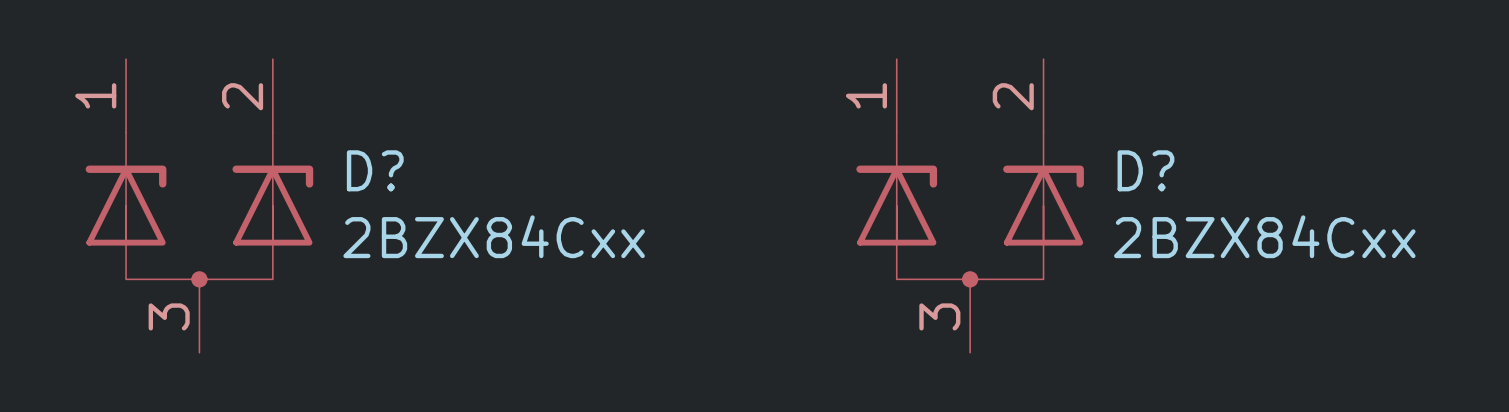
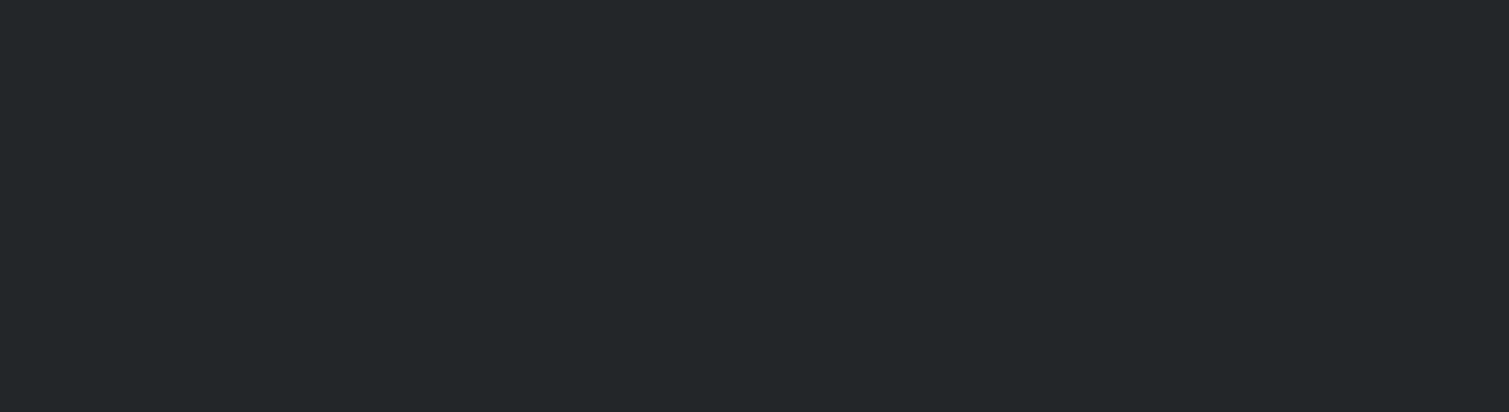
D?: 2BZX84Cxx (199, 205) -> none
D?: 2BZX84Cxx (970, 205) -> none

